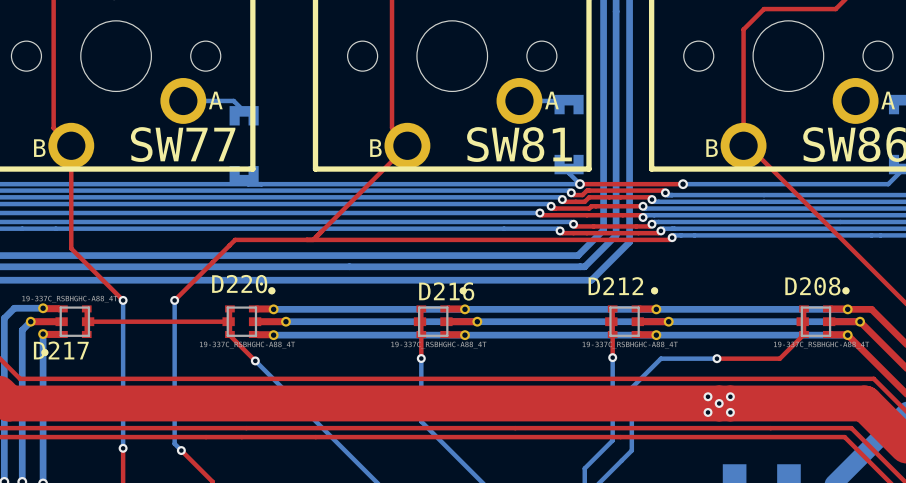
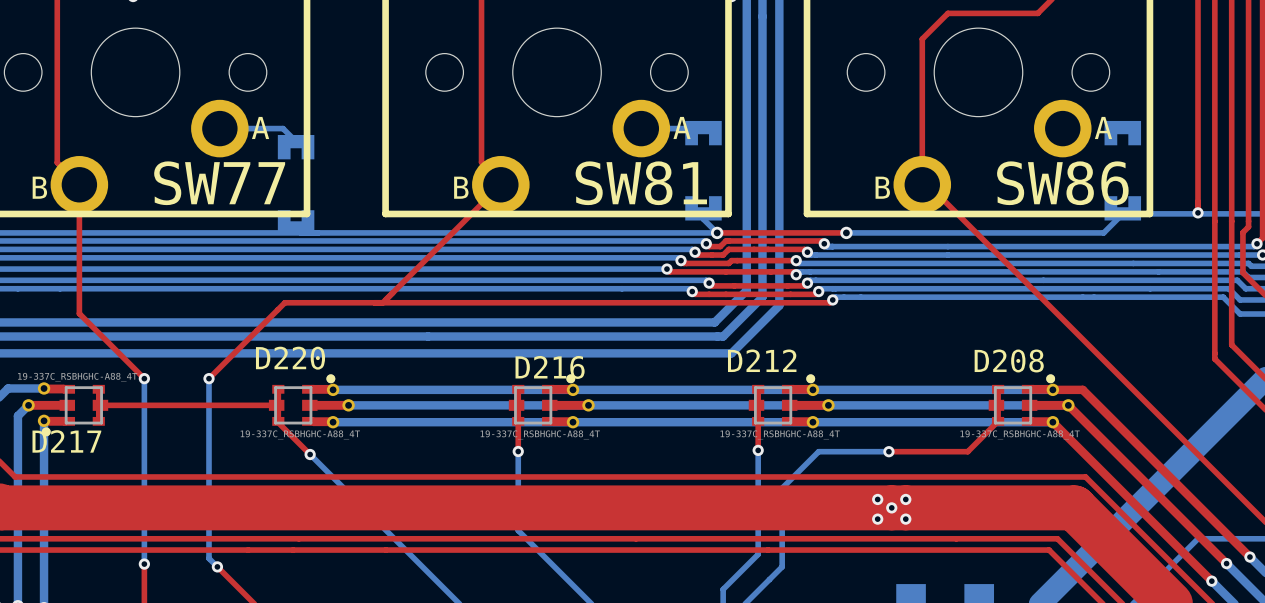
D220 footprint: [222, 287, 291, 341] -> [268, 374, 355, 429]
D216 footprint: [413, 287, 483, 341] -> [508, 374, 595, 429]
D212 footprint: [605, 287, 674, 341] -> [748, 374, 835, 429]
D208 footprint: [796, 287, 866, 341] -> [988, 374, 1075, 429]
D217 footprint: [25, 303, 95, 357] -> [22, 382, 109, 437]

